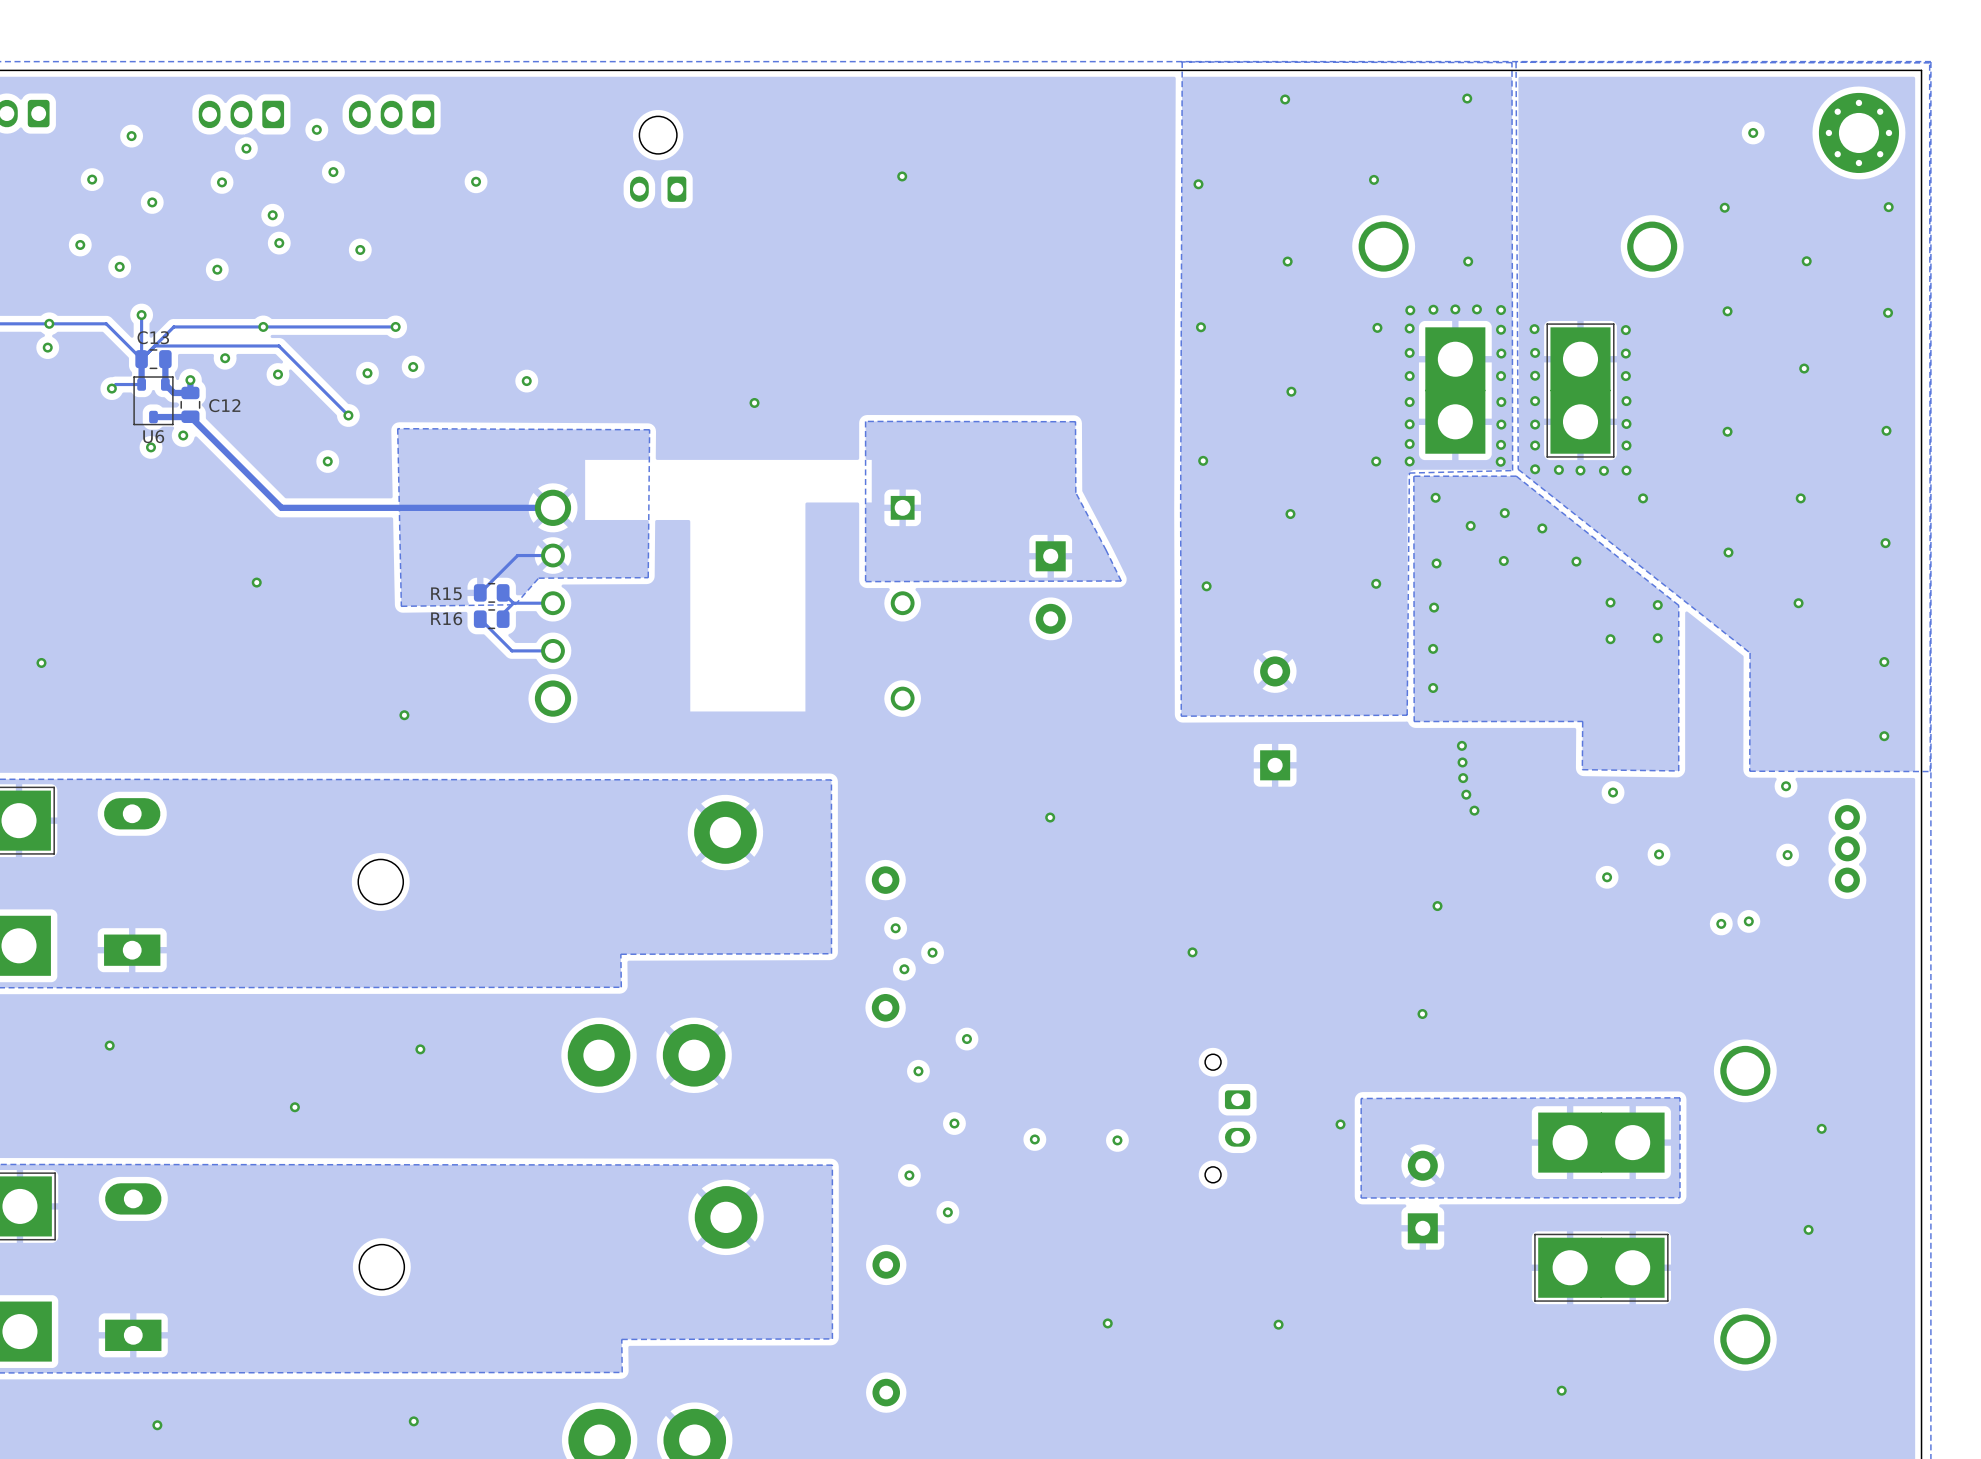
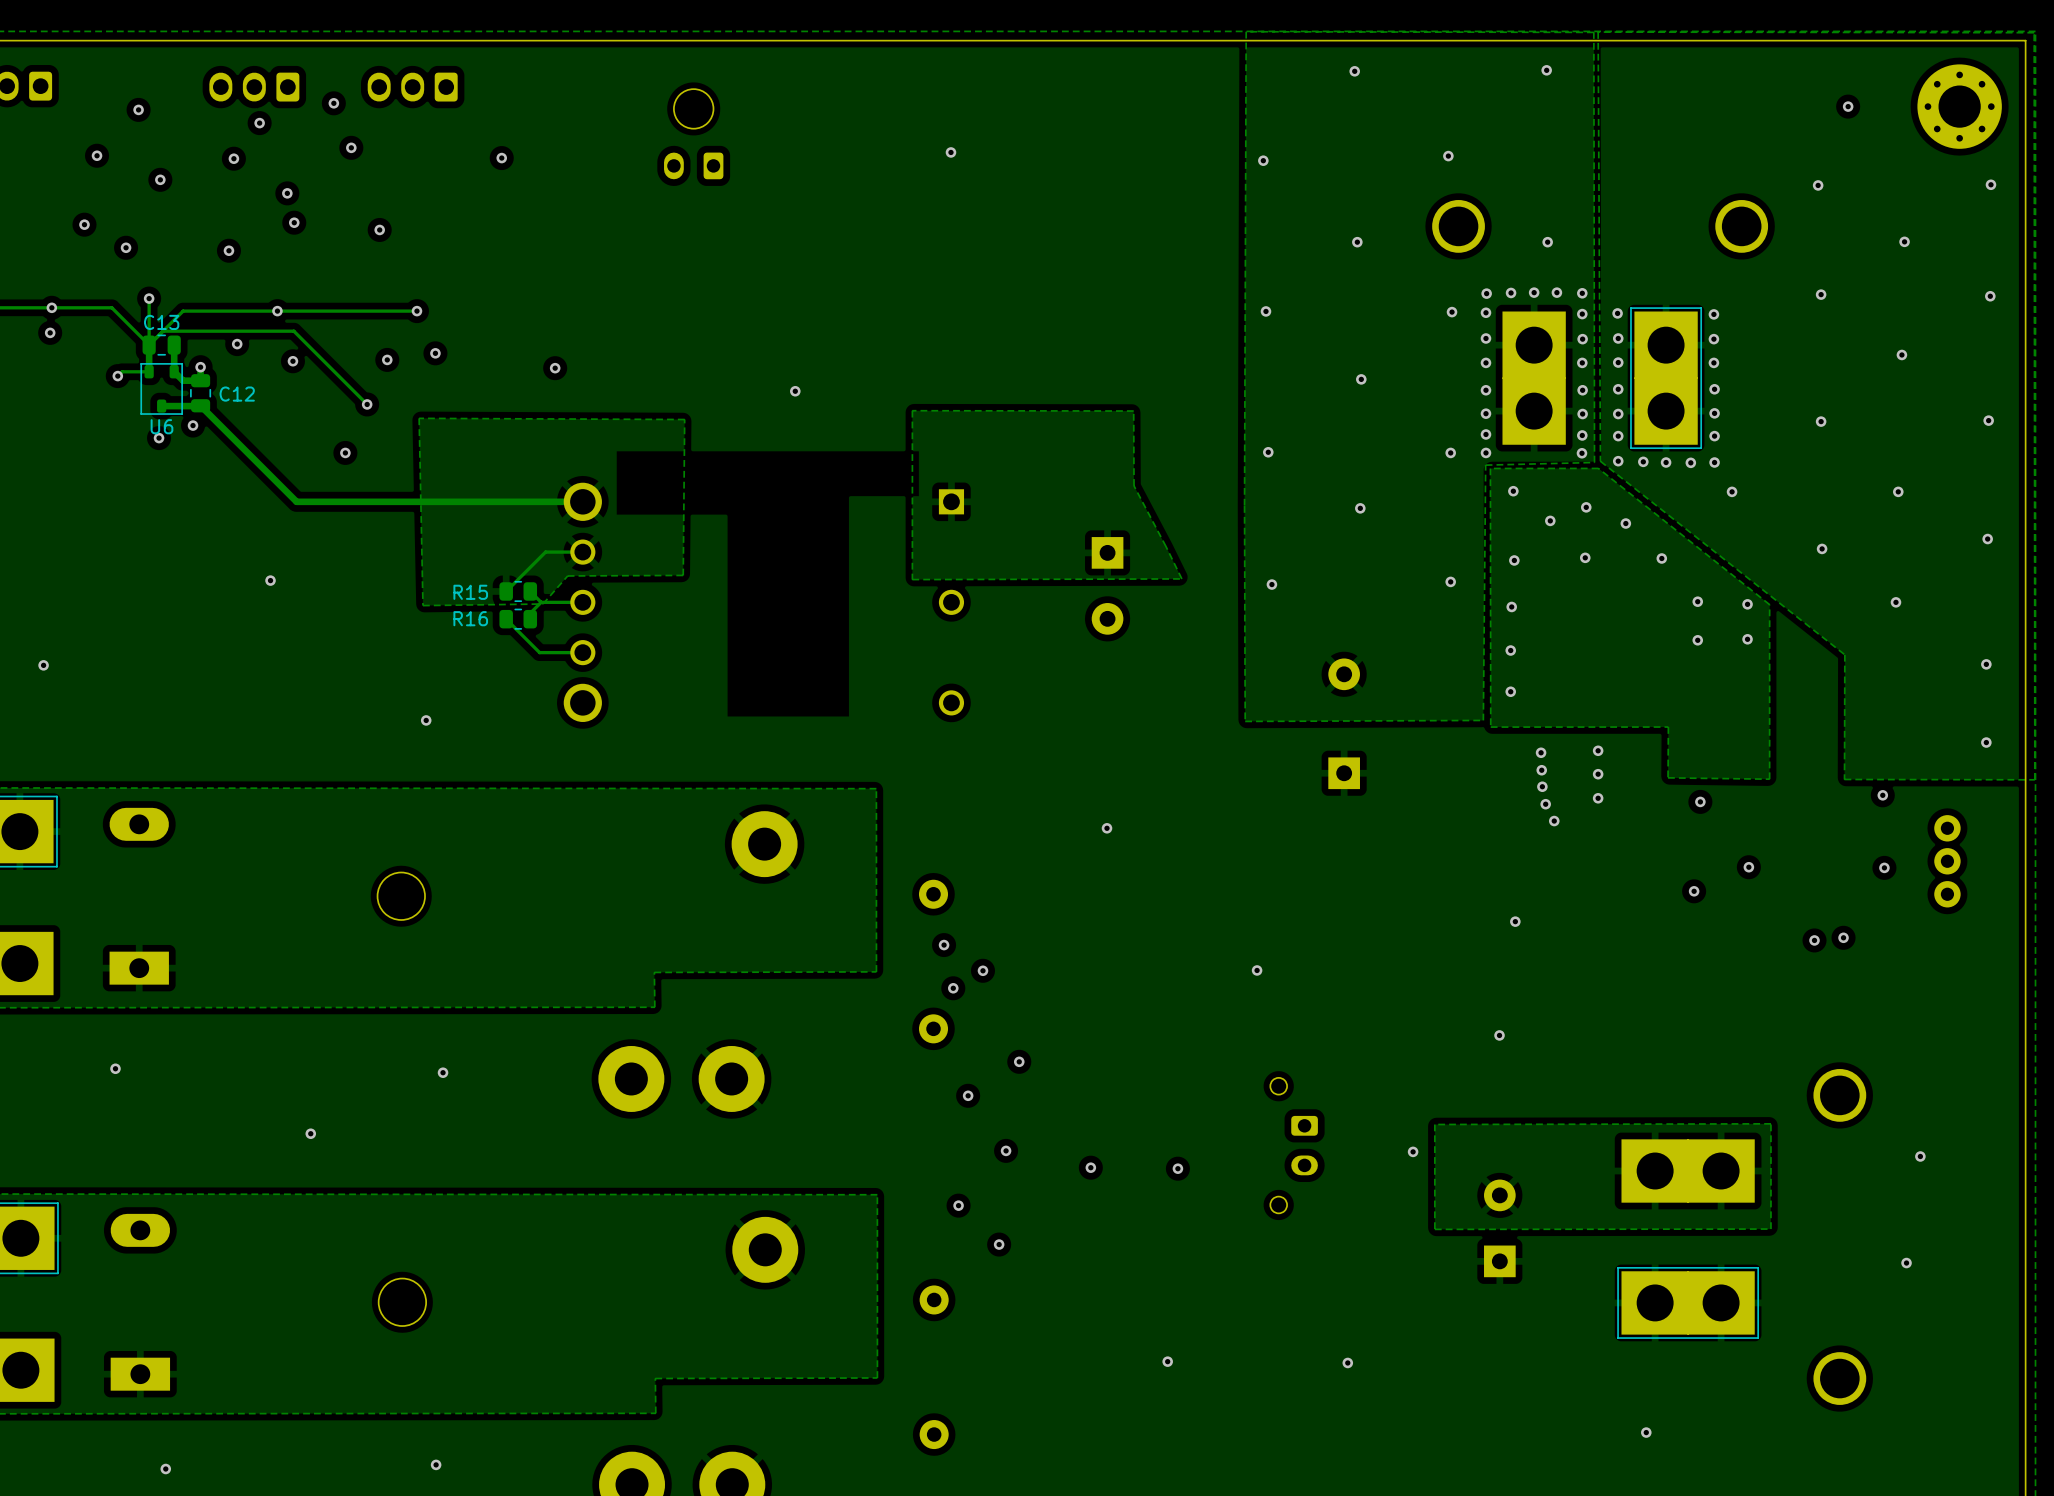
via: none -> (1598, 750)
via: none -> (1598, 774)
via: none -> (1598, 798)

